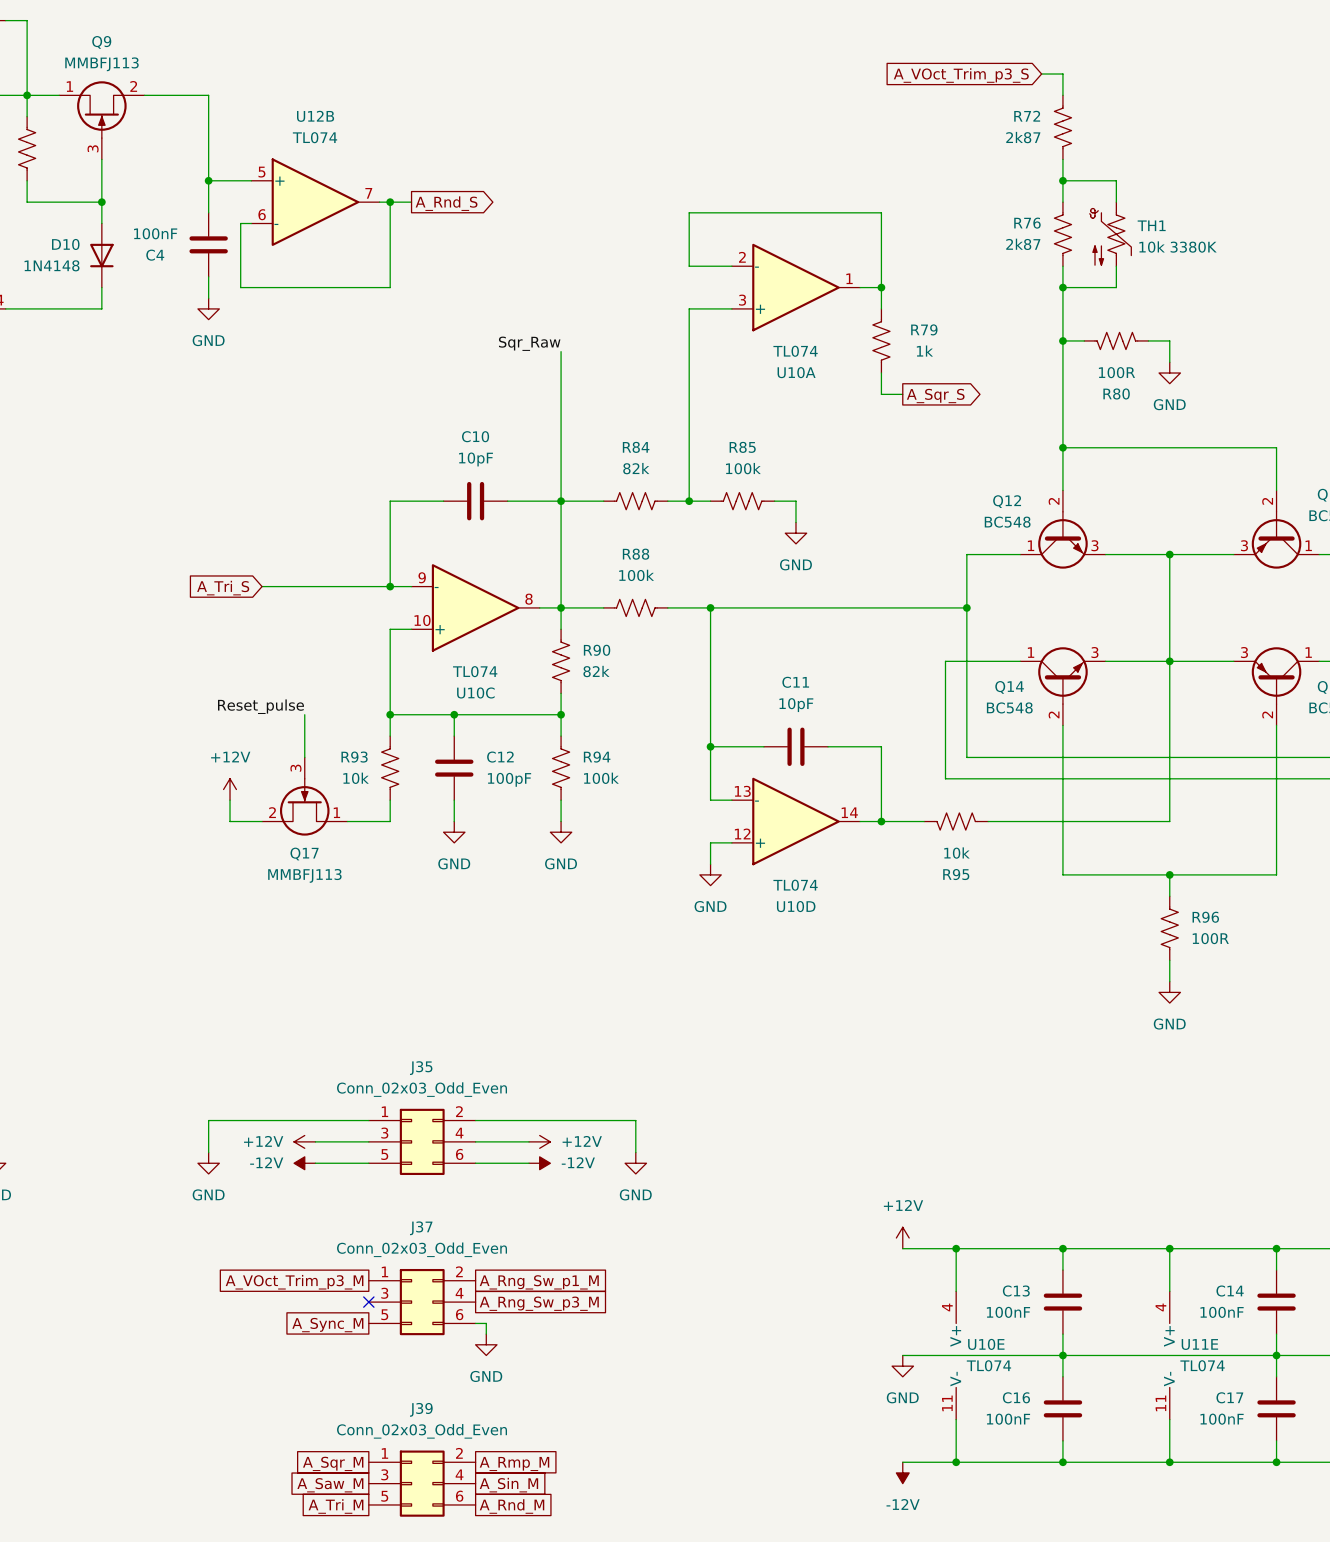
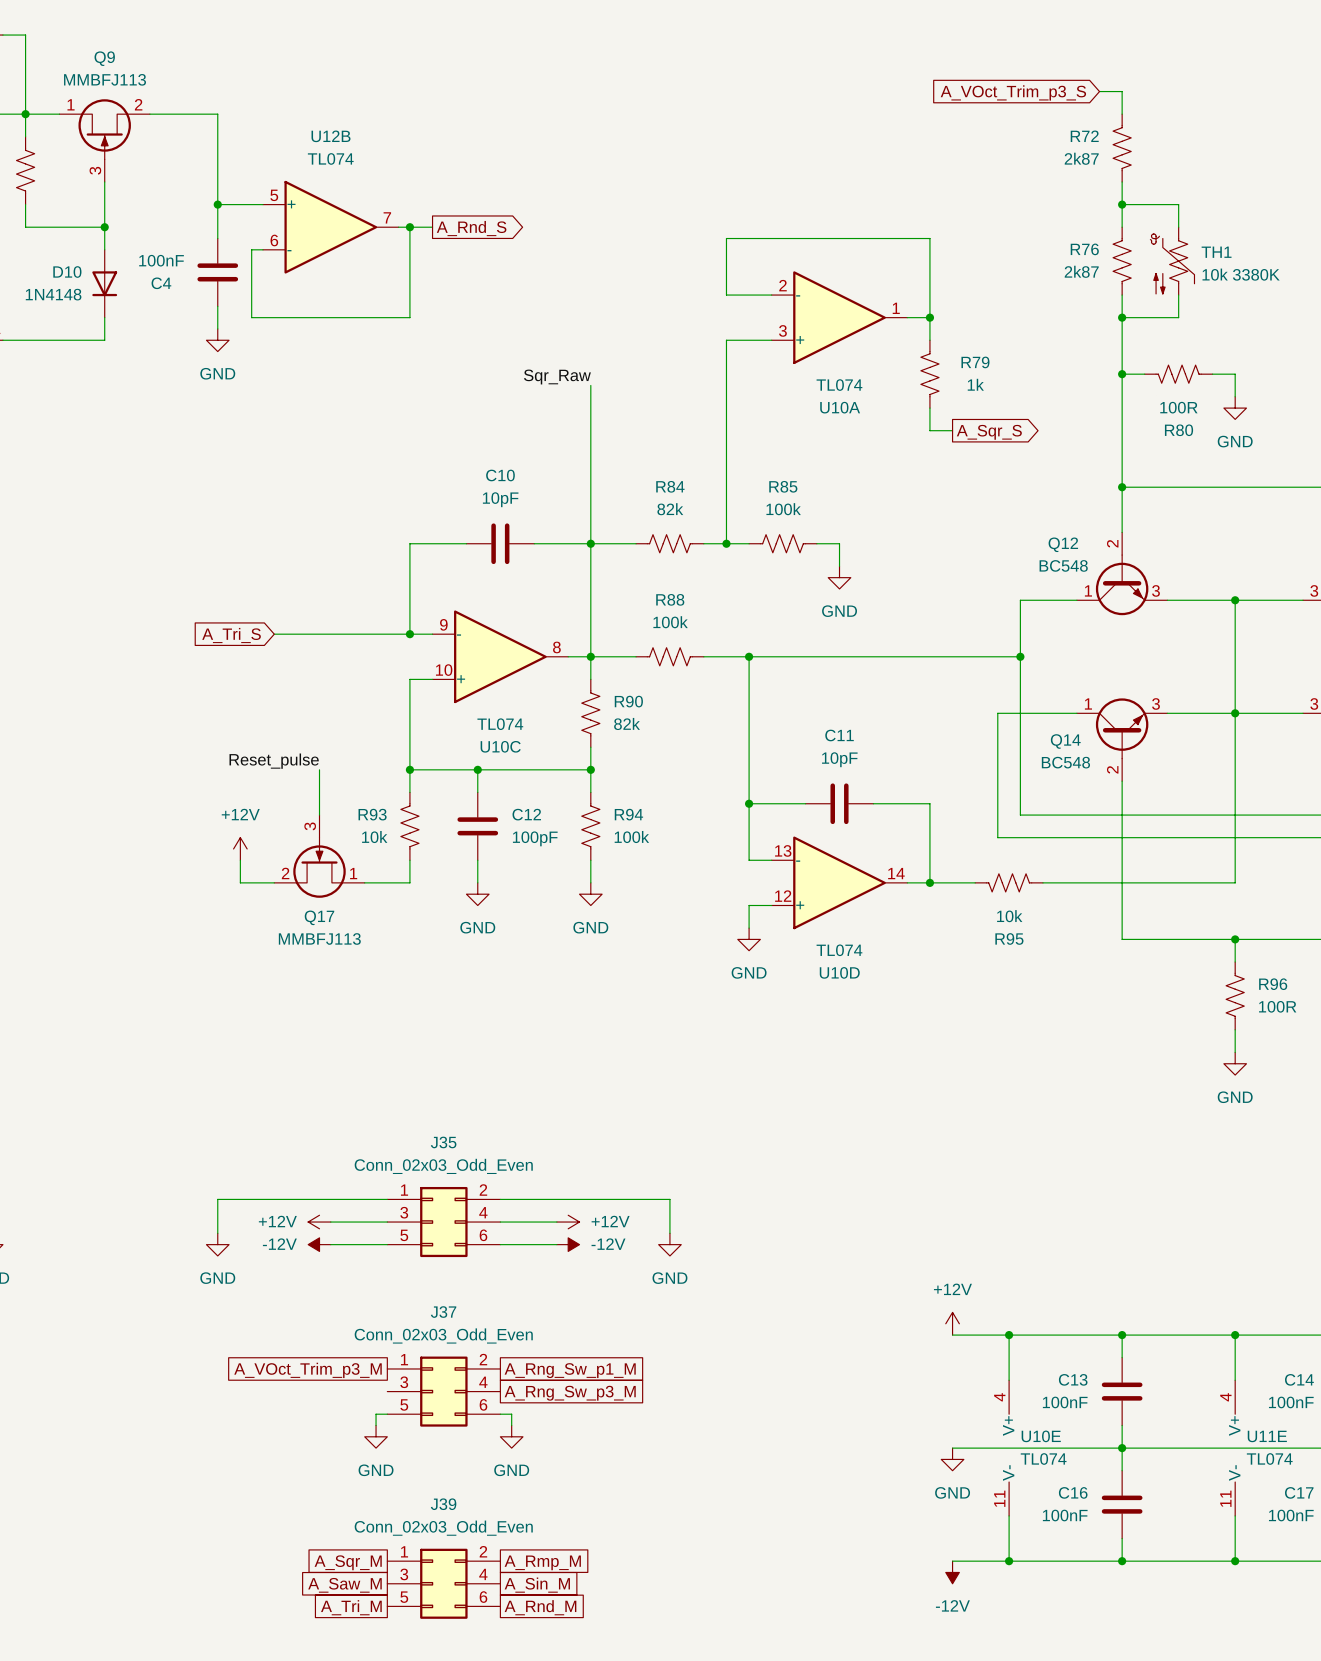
no-connect mark: (368, 1302) -> none
wire: none -> (387, 1414) (376, 1414) (376, 1425)
global label: A_Sync_M (327, 1325) -> none
power symbol: none -> GND (376, 1436)

